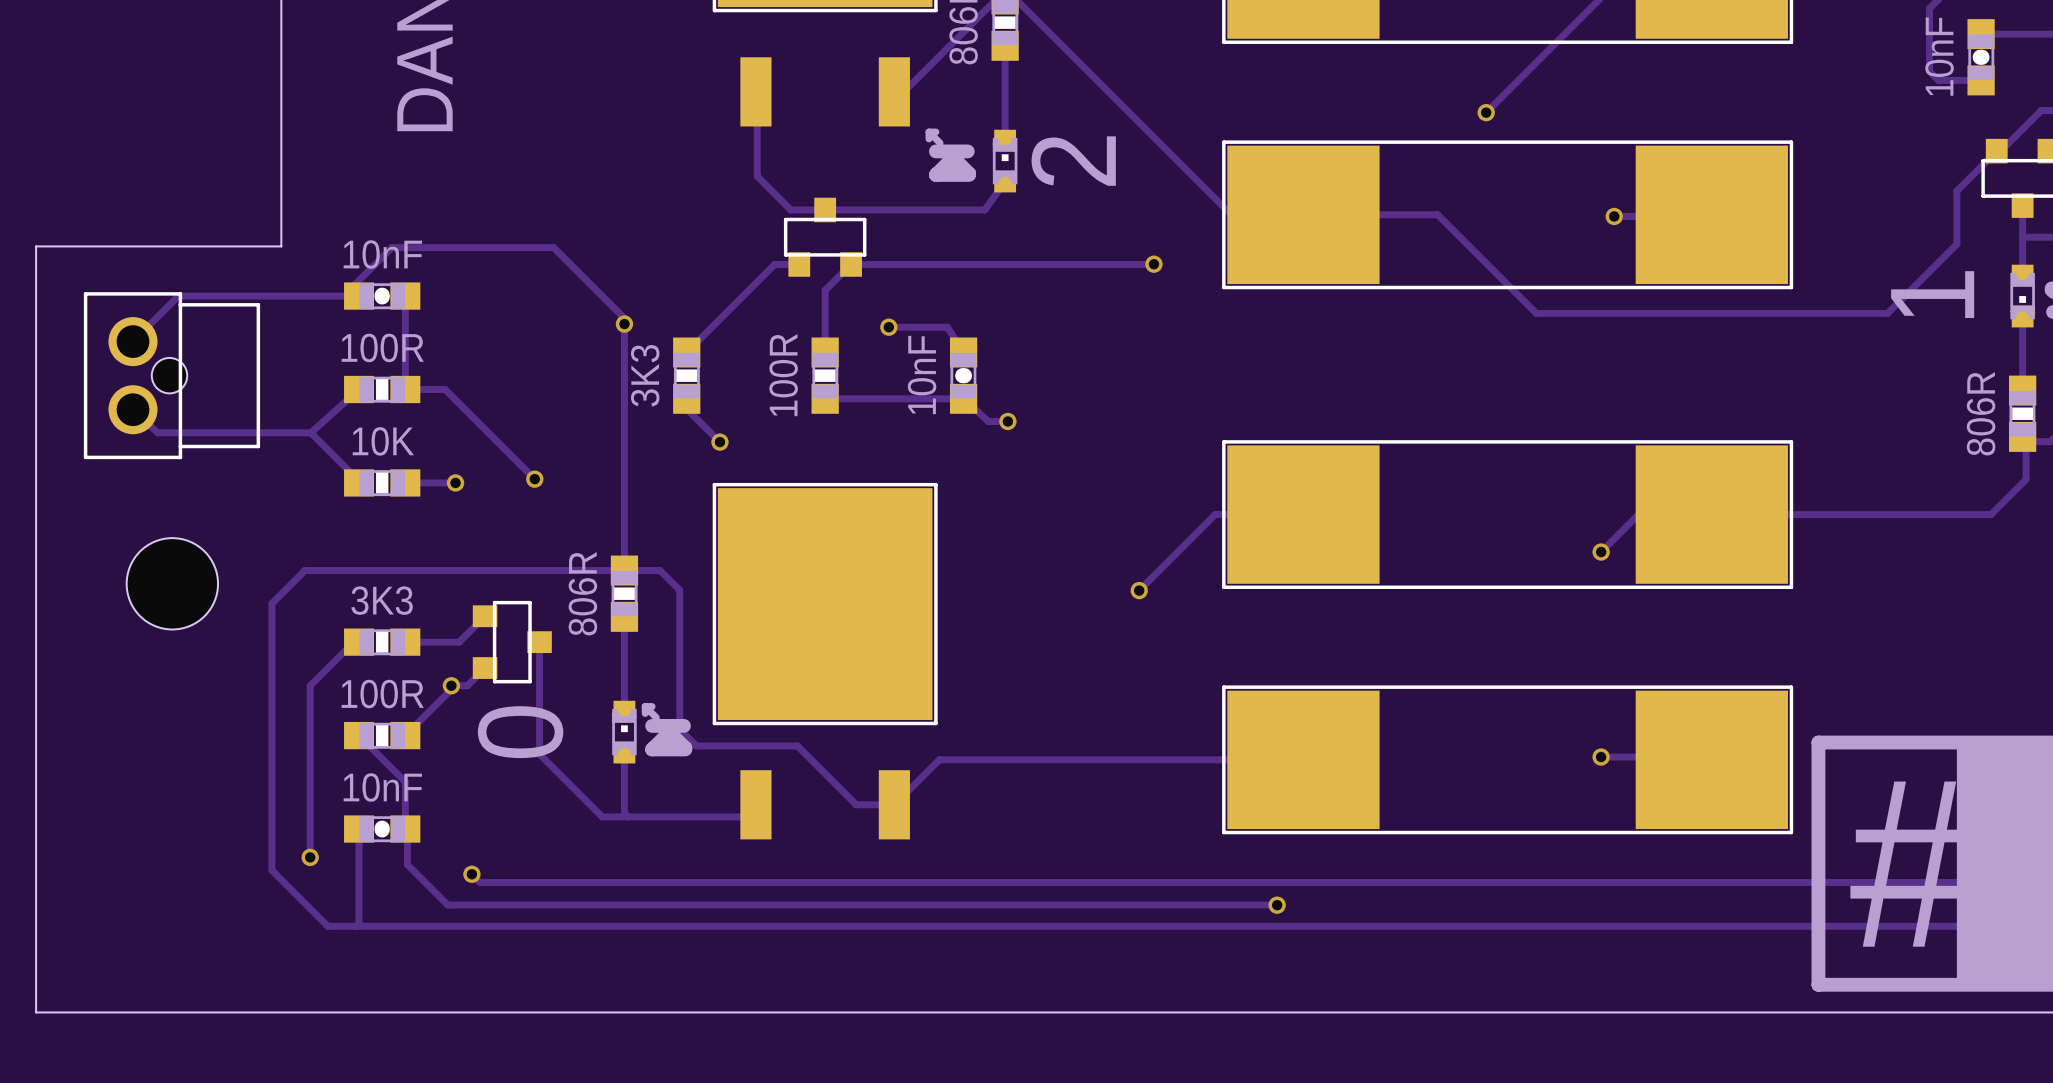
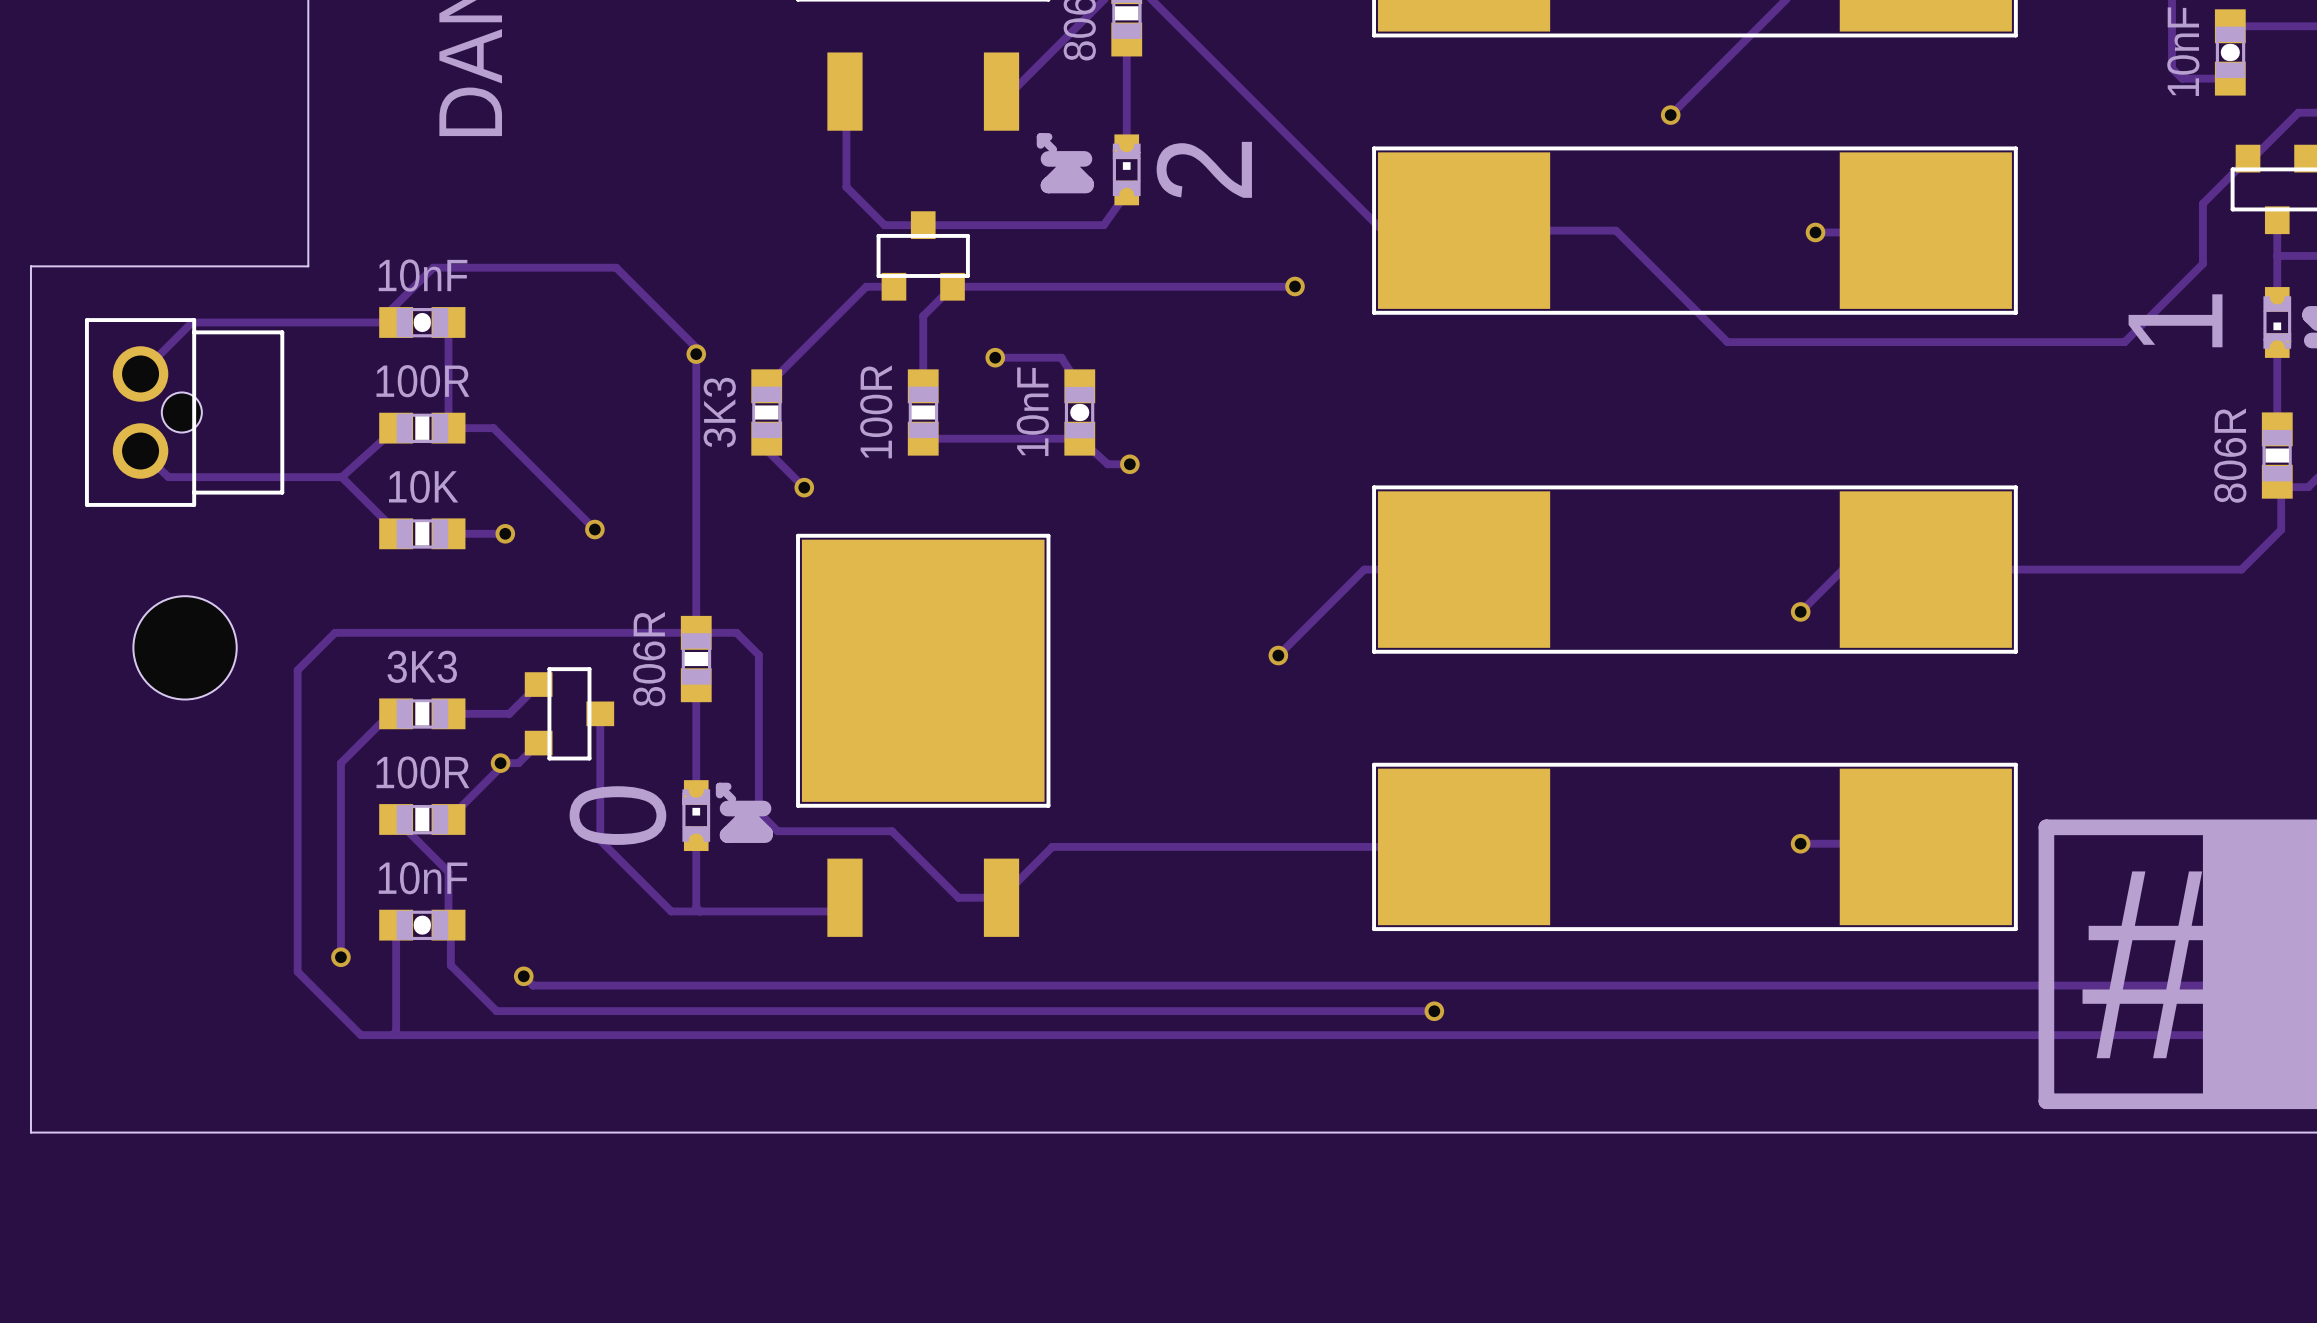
text position: 0 (520, 732) -> 0 (617, 815)

